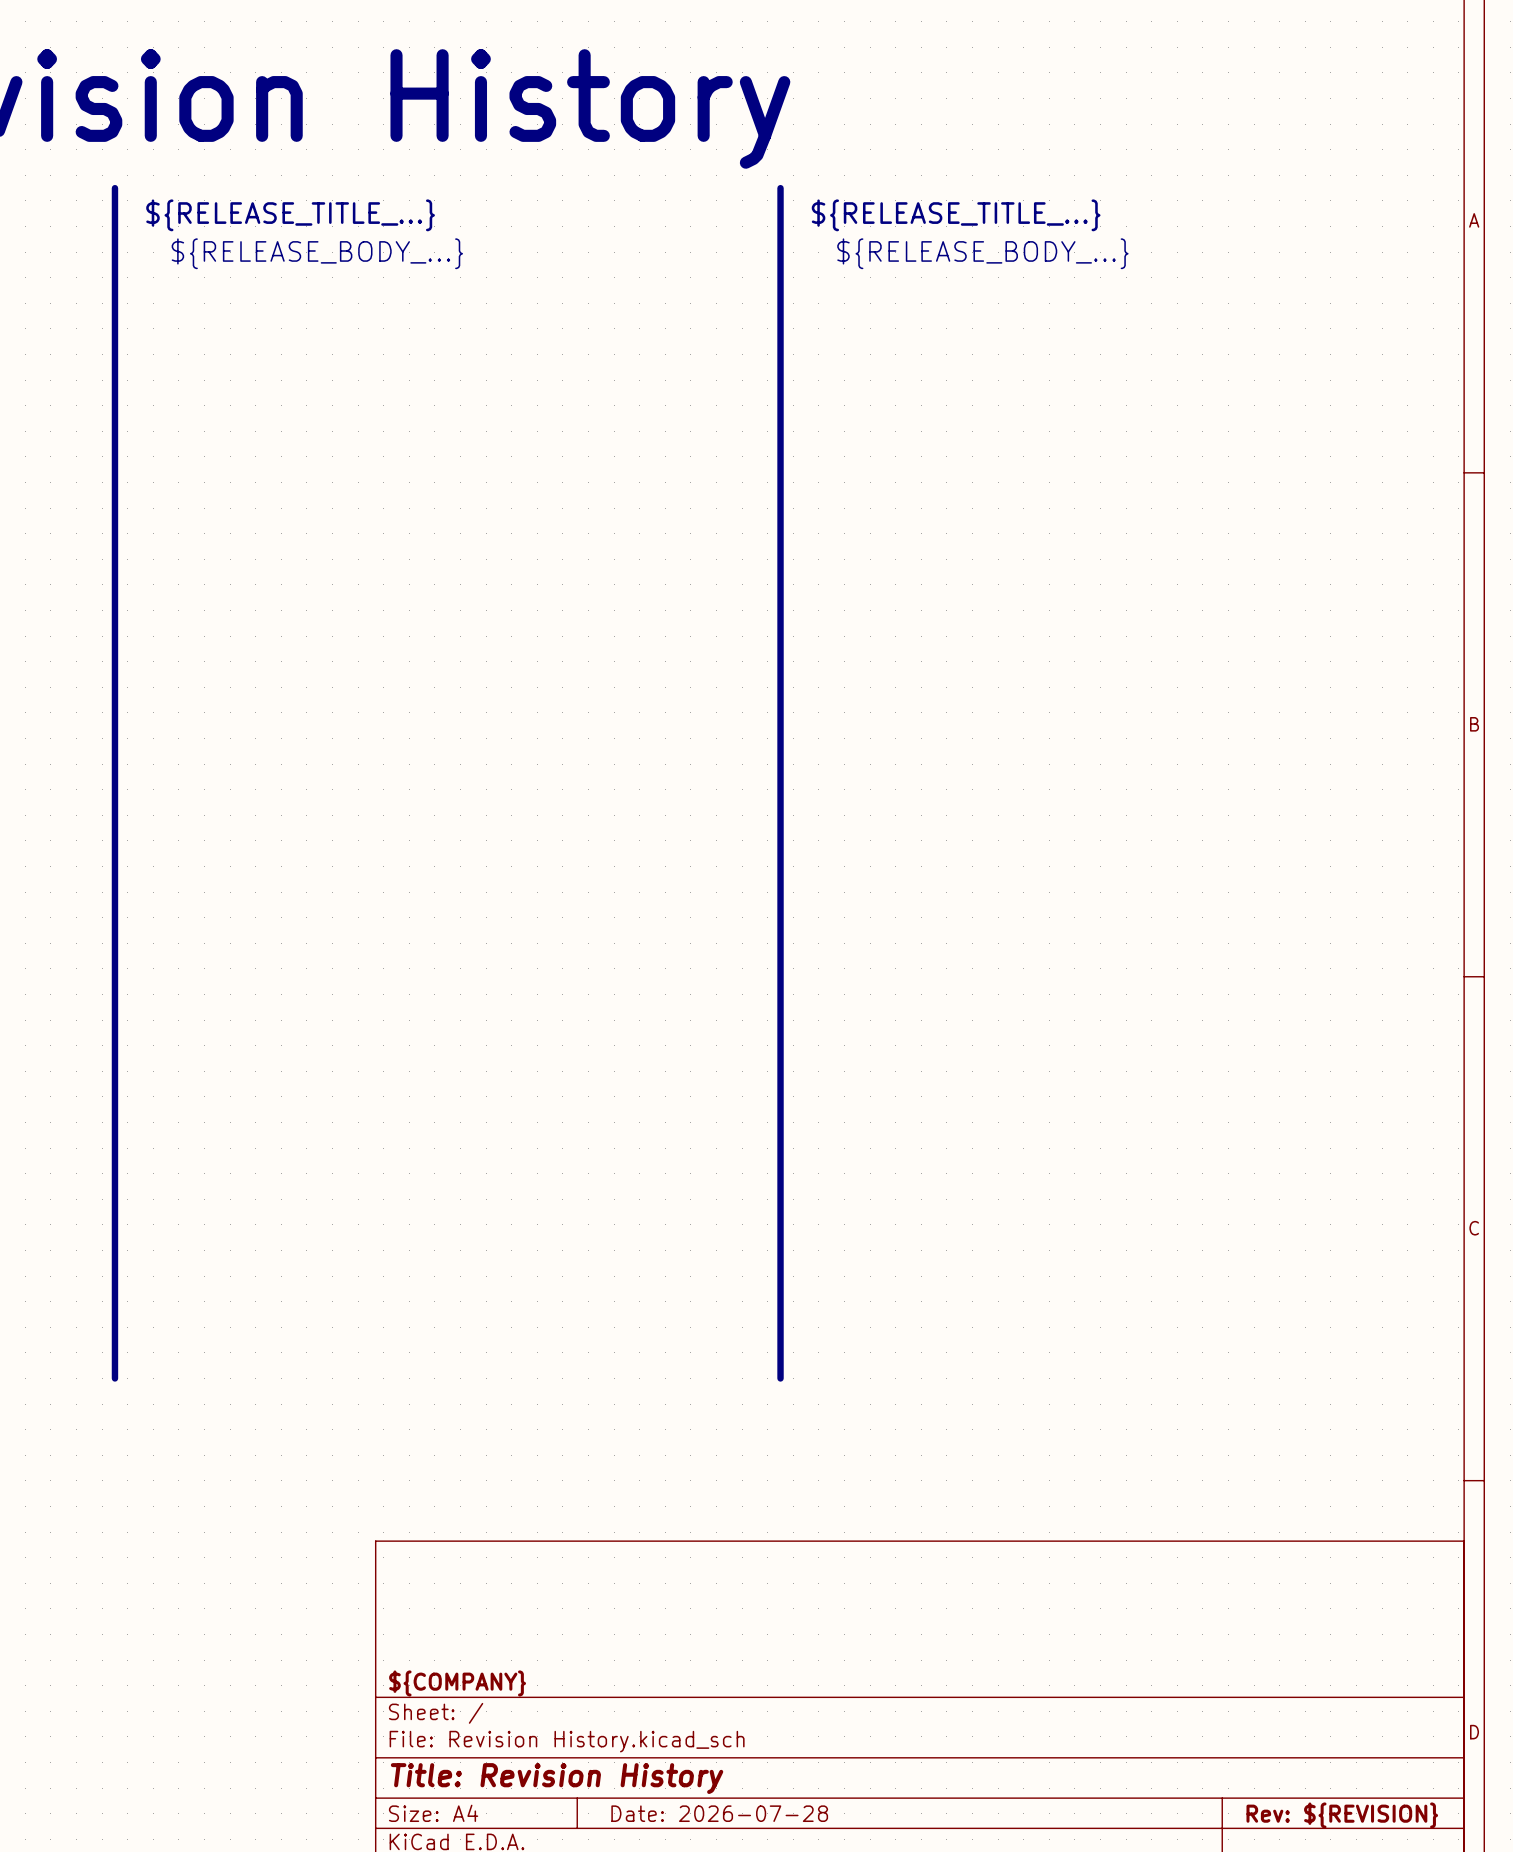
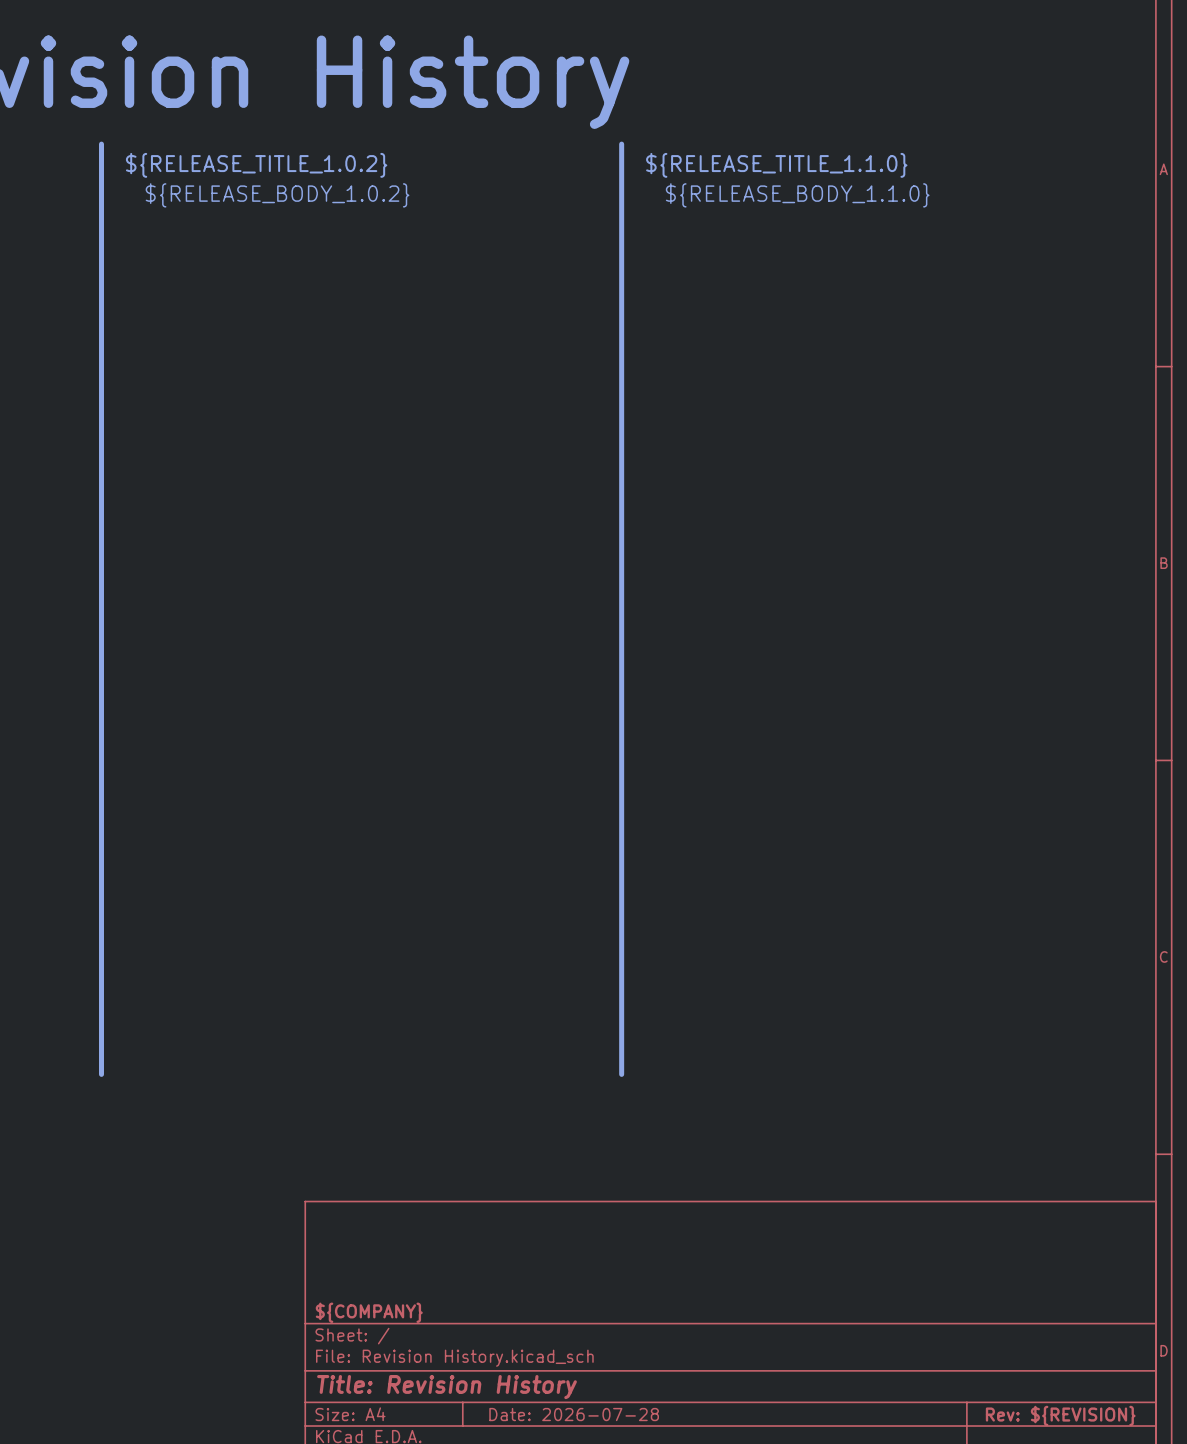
text: ${RELEASE_TITLE_...} (290, 215) -> ${RELEASE_TITLE_1.0.2} (256, 165)
text: ${RELEASE_TITLE_...} (956, 215) -> ${RELEASE_TITLE_1.1.0} (776, 165)
text: ${RELEASE_BODY_...} (317, 253) -> ${RELEASE_BODY_1.0.2} (277, 195)
text: ${RELEASE_BODY_...} (982, 253) -> ${RELEASE_BODY_1.1.0} (797, 195)

